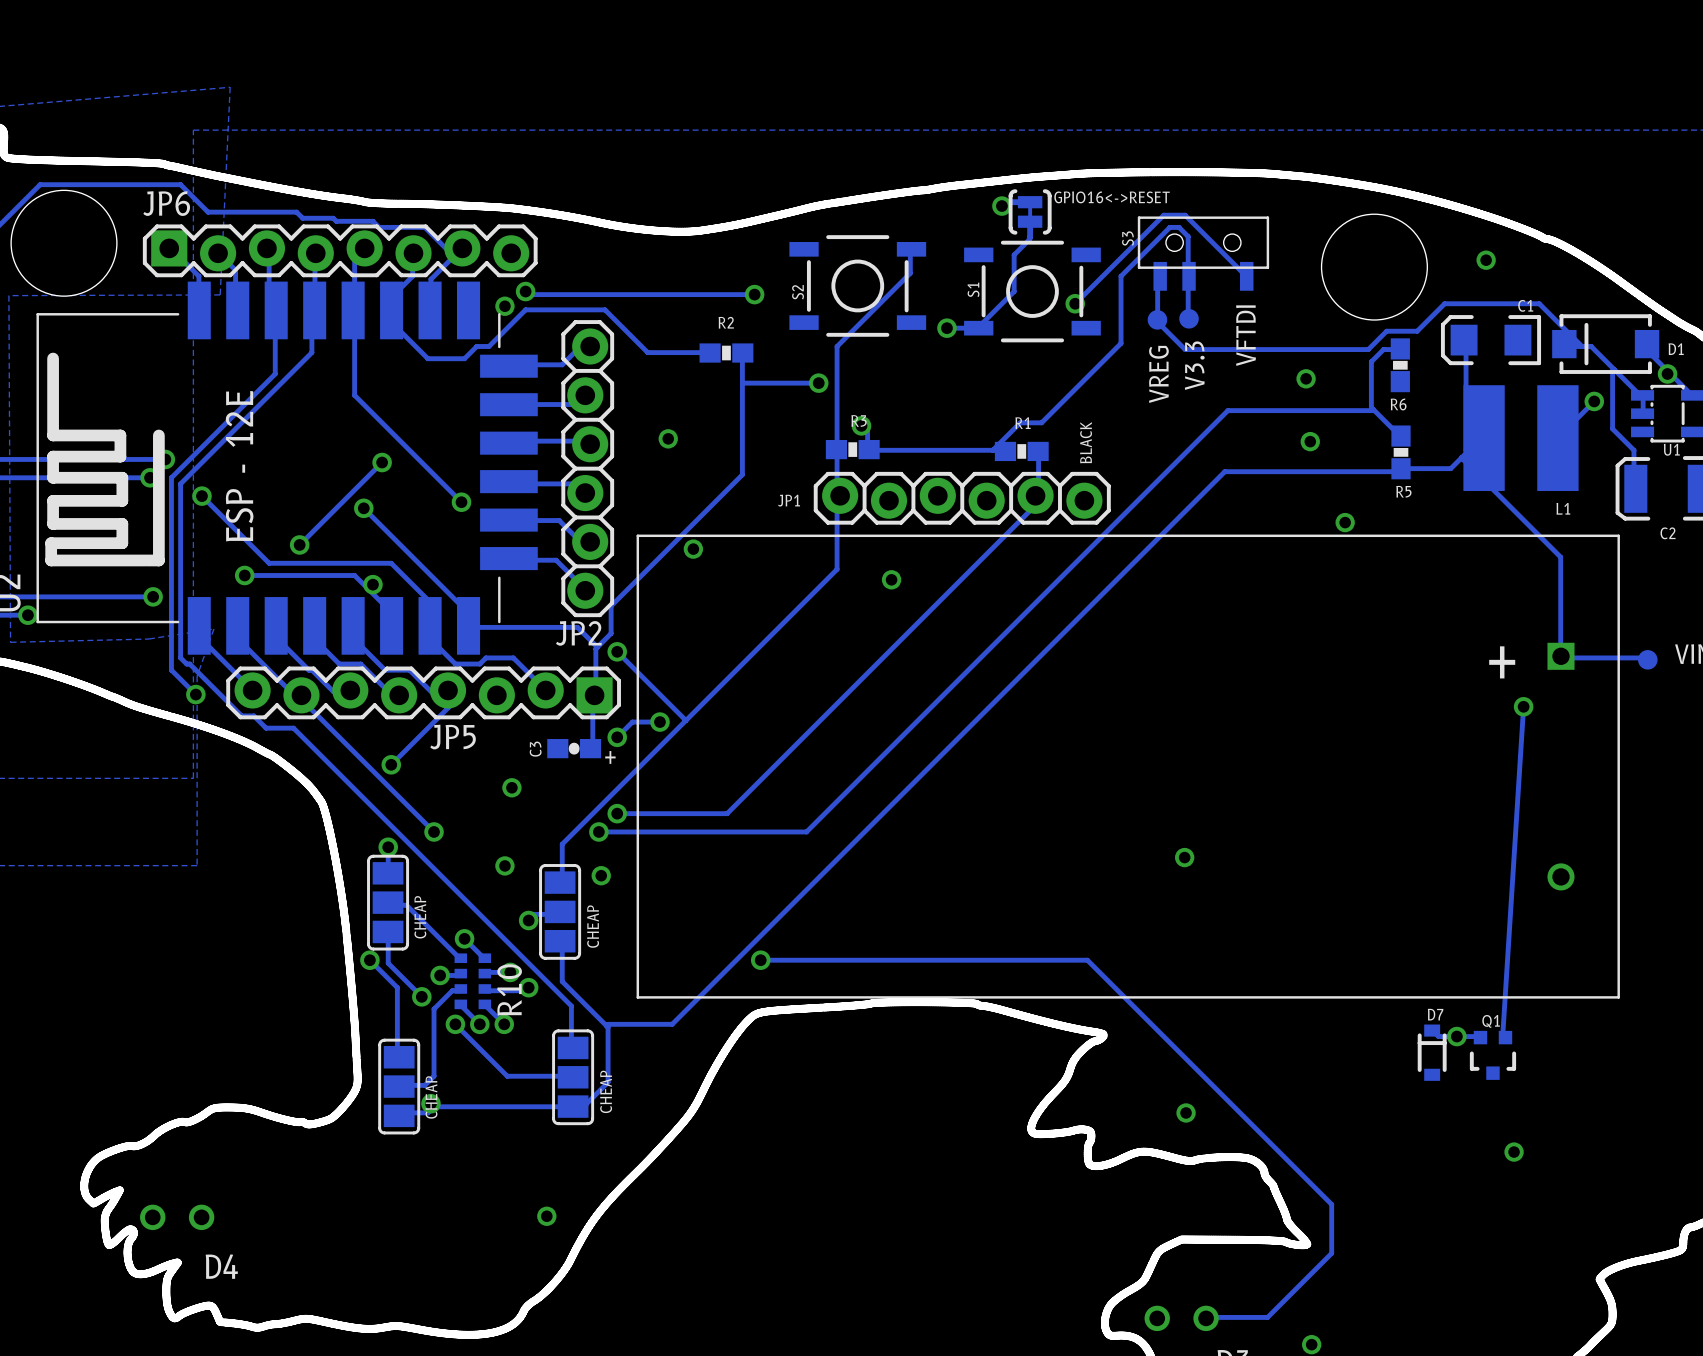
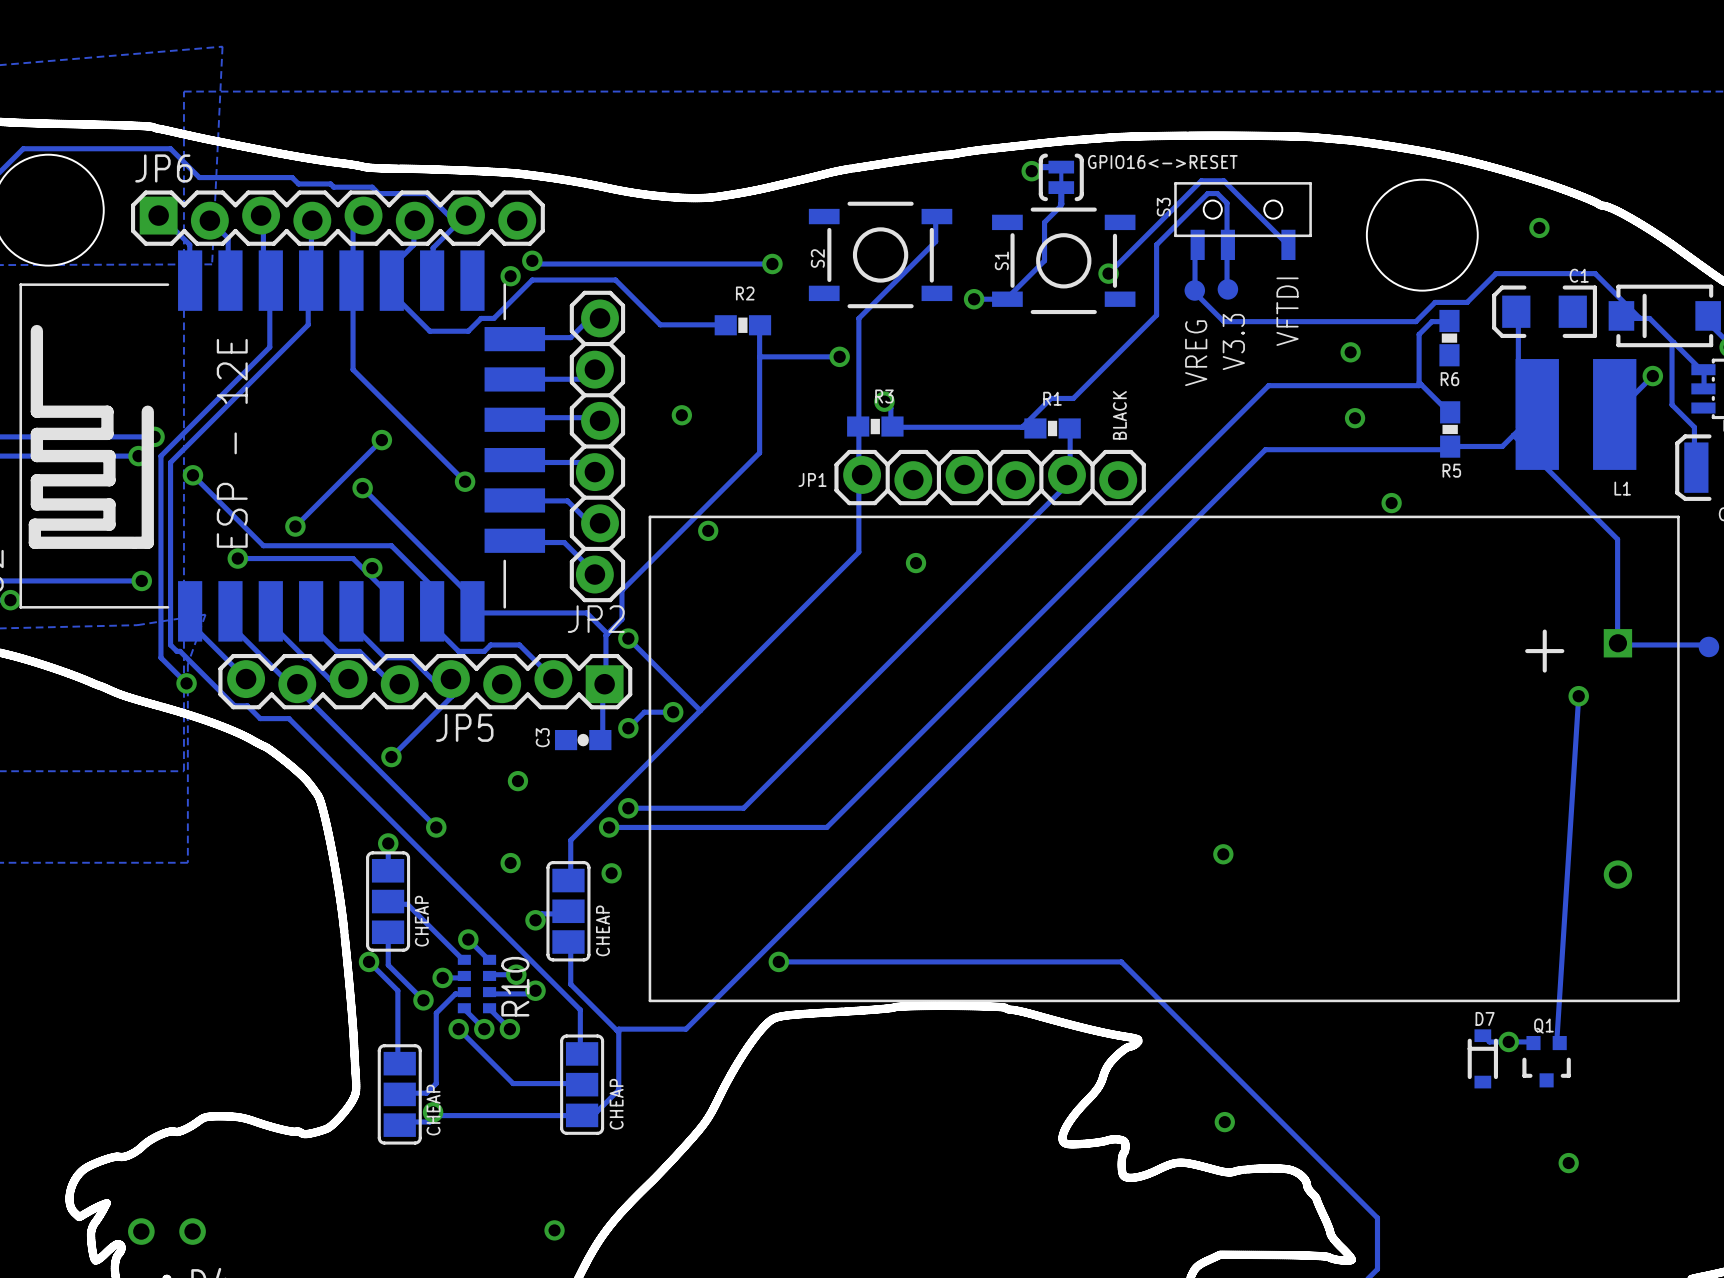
text: + (610, 757) -> none

